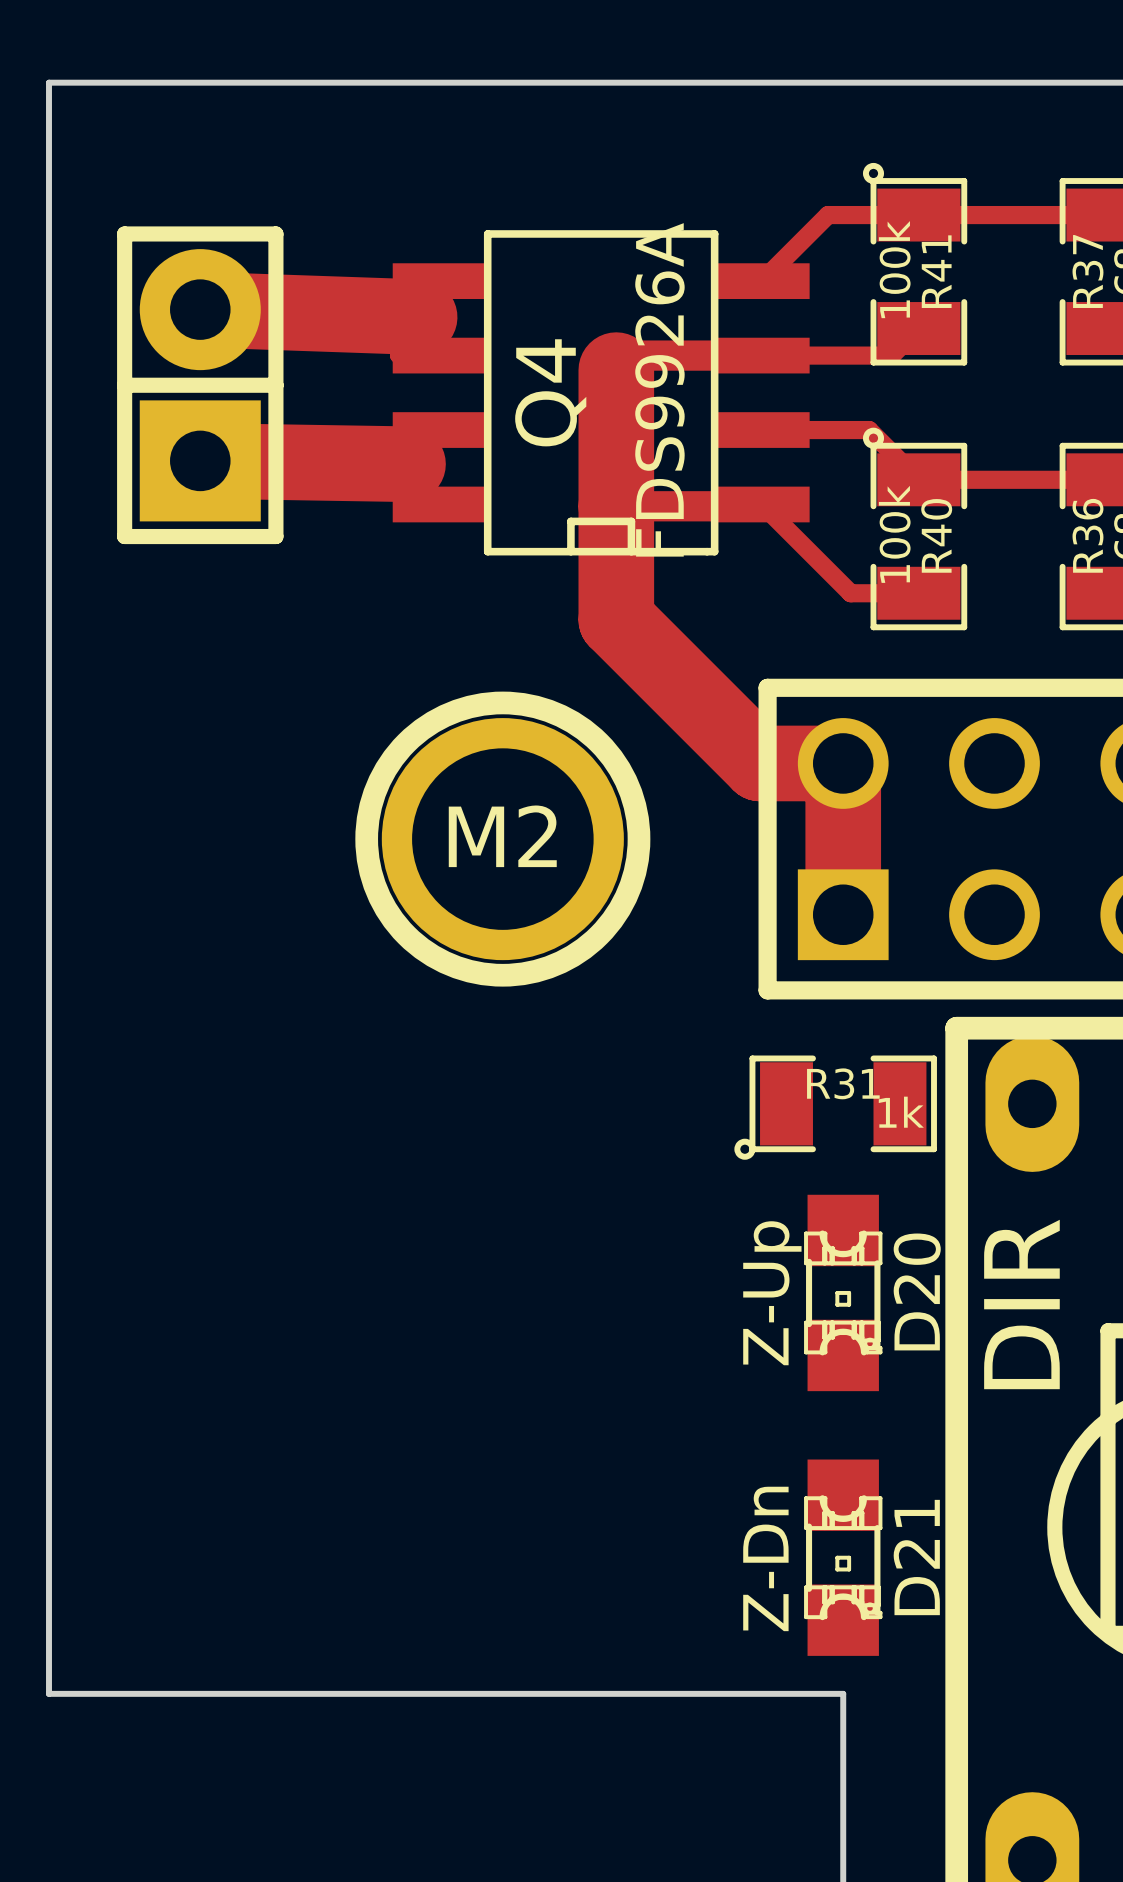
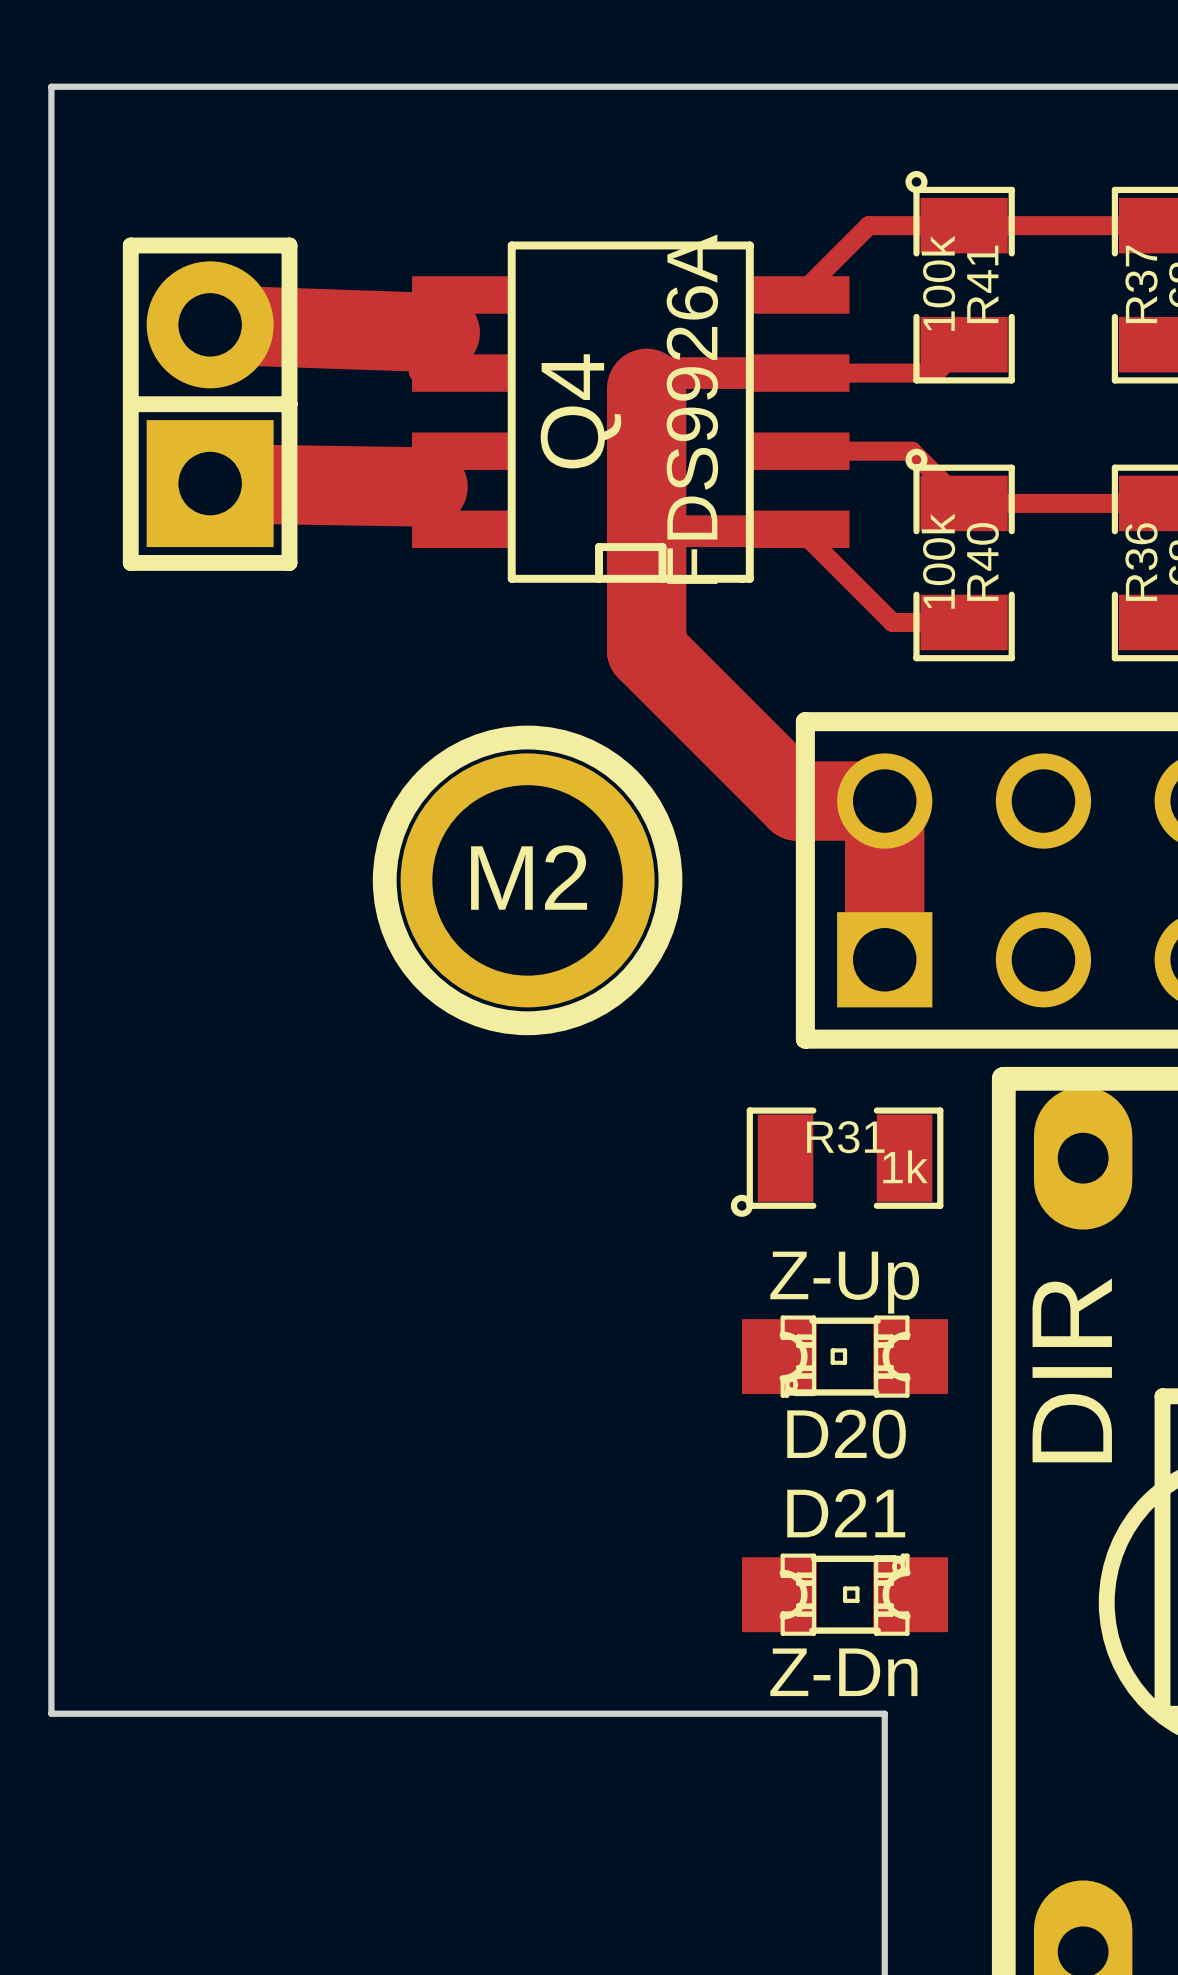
R31 position: (835, 1107) -> (837, 1162)
D20 rotation: 0° (843, 1292) -> 90° clockwise (845, 1356)
D21 rotation: 0° (843, 1557) -> 90° counterclockwise (845, 1594)
board edge: (48, 1633) (48, 1693) (843, 1693) -> (51, 1713) (884, 1713) (884, 1777)

